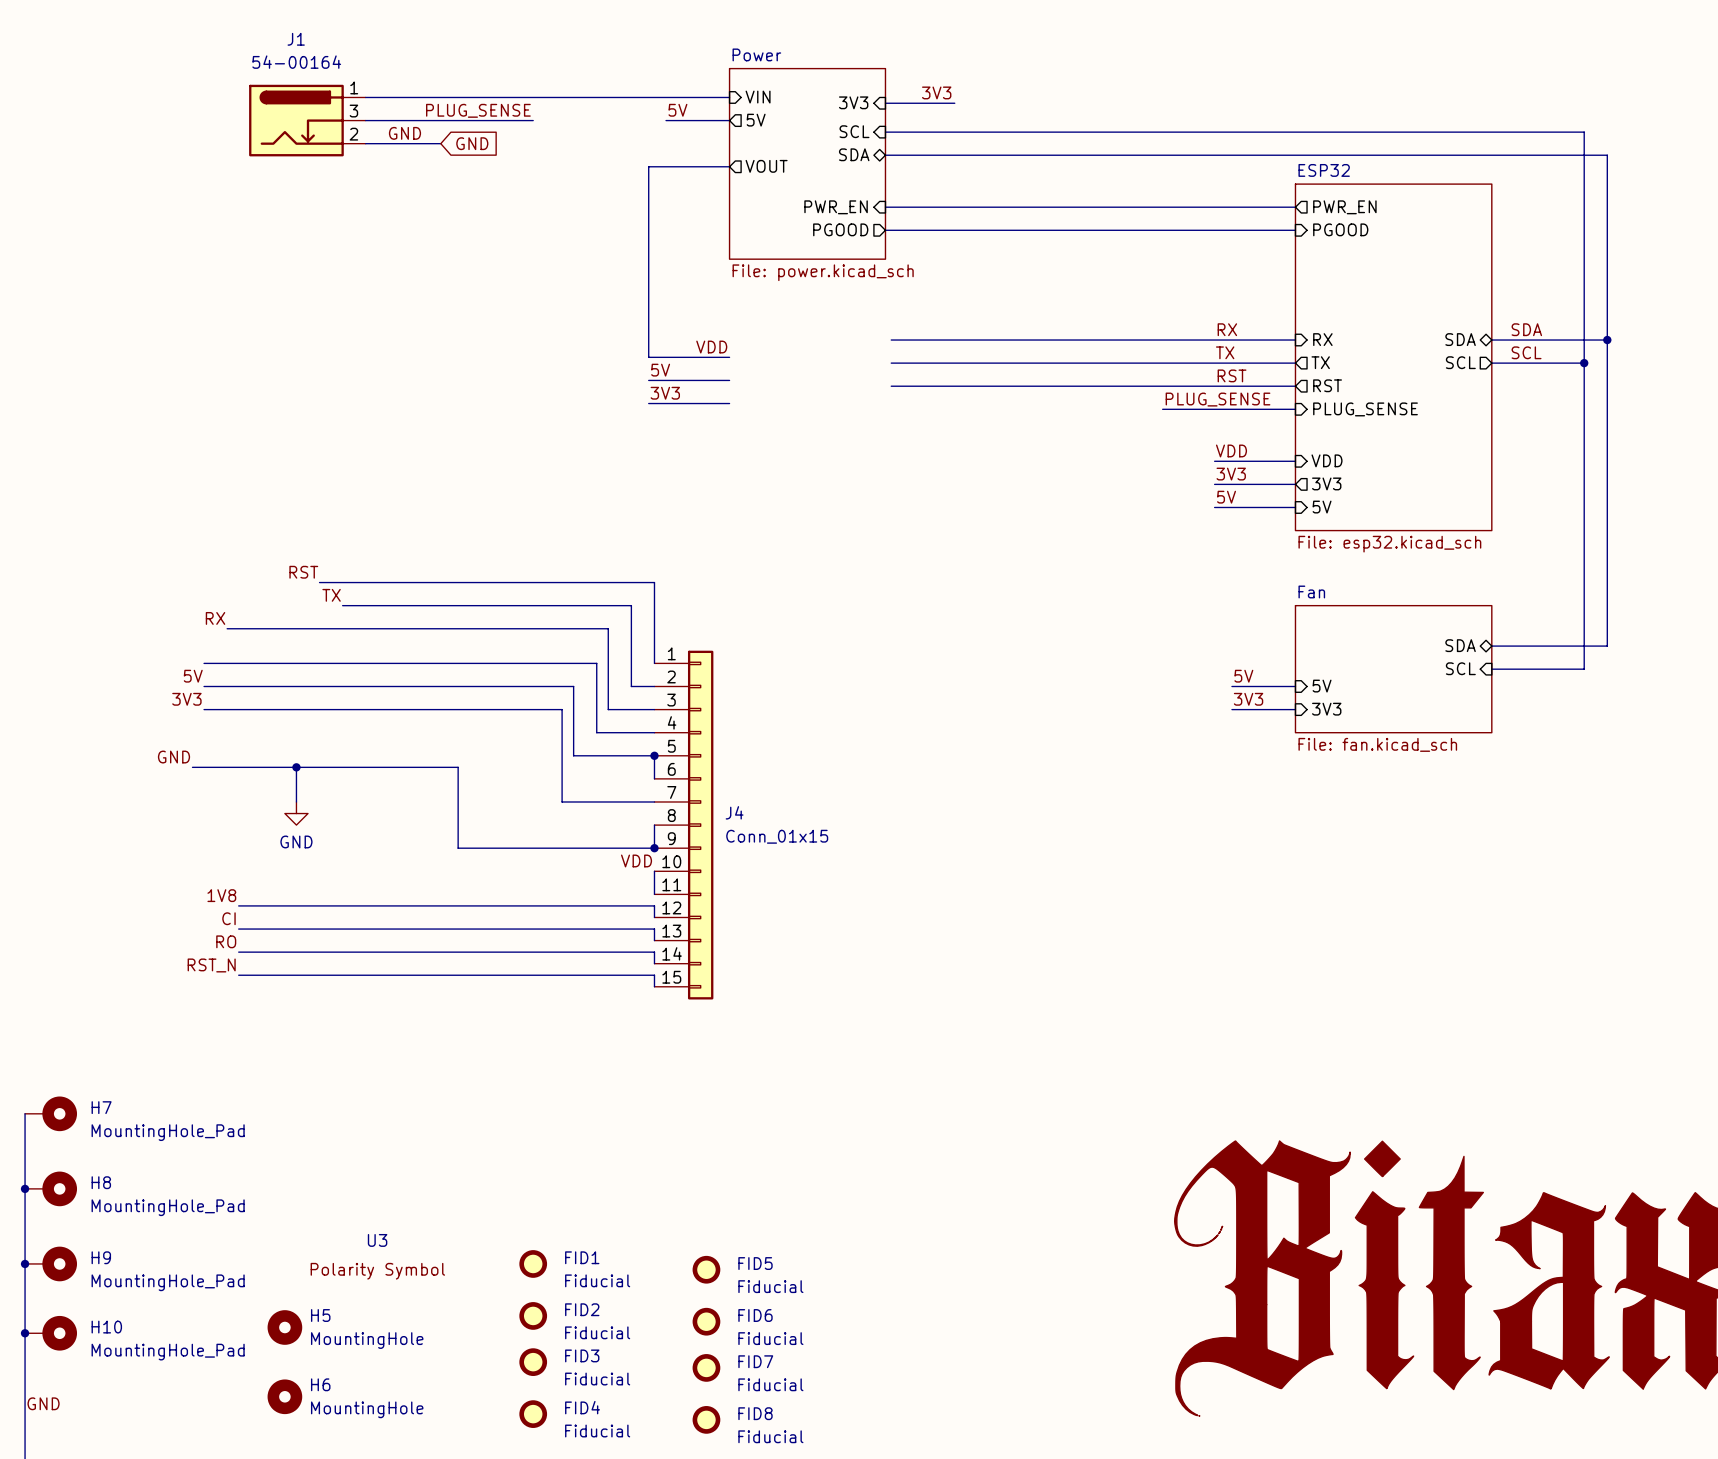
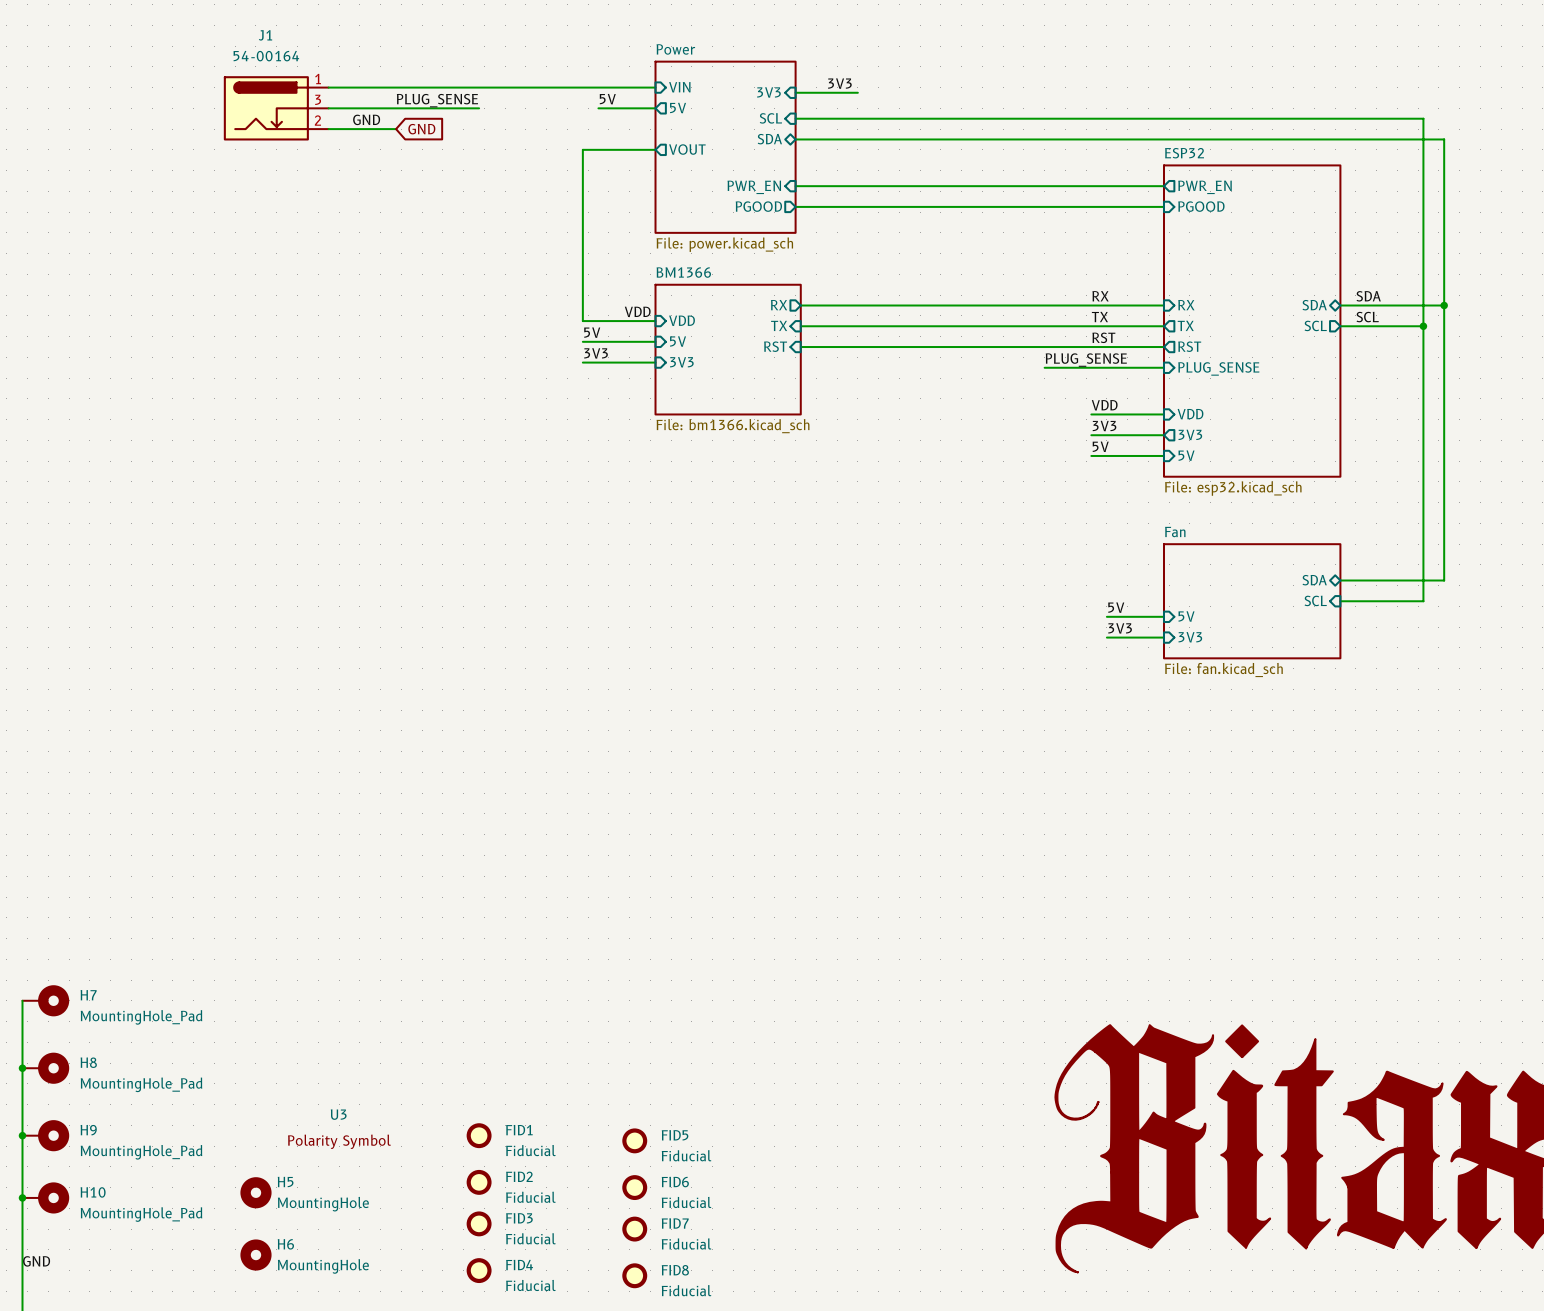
sheet pin: none -> RX (779, 305)
sheet pin: none -> VDD (682, 320)
sheet pin: none -> TX (779, 325)
sheet pin: none -> 5V (678, 341)
sheet pin: none -> RST (775, 346)
sheet BM1366: none -> File: bm1366.kicad_sch (728, 349)
sheet pin: none -> 3V3 (681, 362)
label: RST (303, 572) -> none
wire: (319, 582) (654, 582) (654, 663) -> none
label: TX (331, 595) -> none
wire: (342, 605) (631, 605) (631, 686) (654, 686) -> none
label: RX (215, 618) -> none
wire: (227, 628) (608, 628) (608, 709) (654, 709) -> none
wire: (204, 663) (596, 663) (596, 732) (654, 732) -> none
label: 5V (193, 676) -> none
wire: (204, 686) (573, 686) (573, 755) (654, 755) (654, 778) -> none
label: 3V3 (186, 699) -> none
wire: (204, 709) (562, 709) (562, 801) (654, 801) -> none
junction: (654, 755) -> none
label: GND (173, 757) -> none
wire: (192, 767) (458, 767) (458, 848) (654, 848) (654, 825) -> none
wire: (296, 767) (296, 801) -> none
junction: (296, 767) -> none
power symbol: GND (296, 813) -> none
J4: Conn_01x15 (683, 825) -> none
junction: (654, 848) -> none
label: VDD (636, 860) -> none
wire: (654, 871) (654, 894) -> none
label: 1V8 (221, 895) -> none
wire: (238, 905) (654, 905) (654, 917) -> none
label: CI (228, 918) -> none
wire: (238, 929) (654, 929) (654, 940) -> none
label: RO (226, 941) -> none
wire: (238, 952) (654, 952) (654, 963) -> none
label: RST_N (211, 965) -> none
wire: (238, 975) (654, 975) (654, 986) -> none

